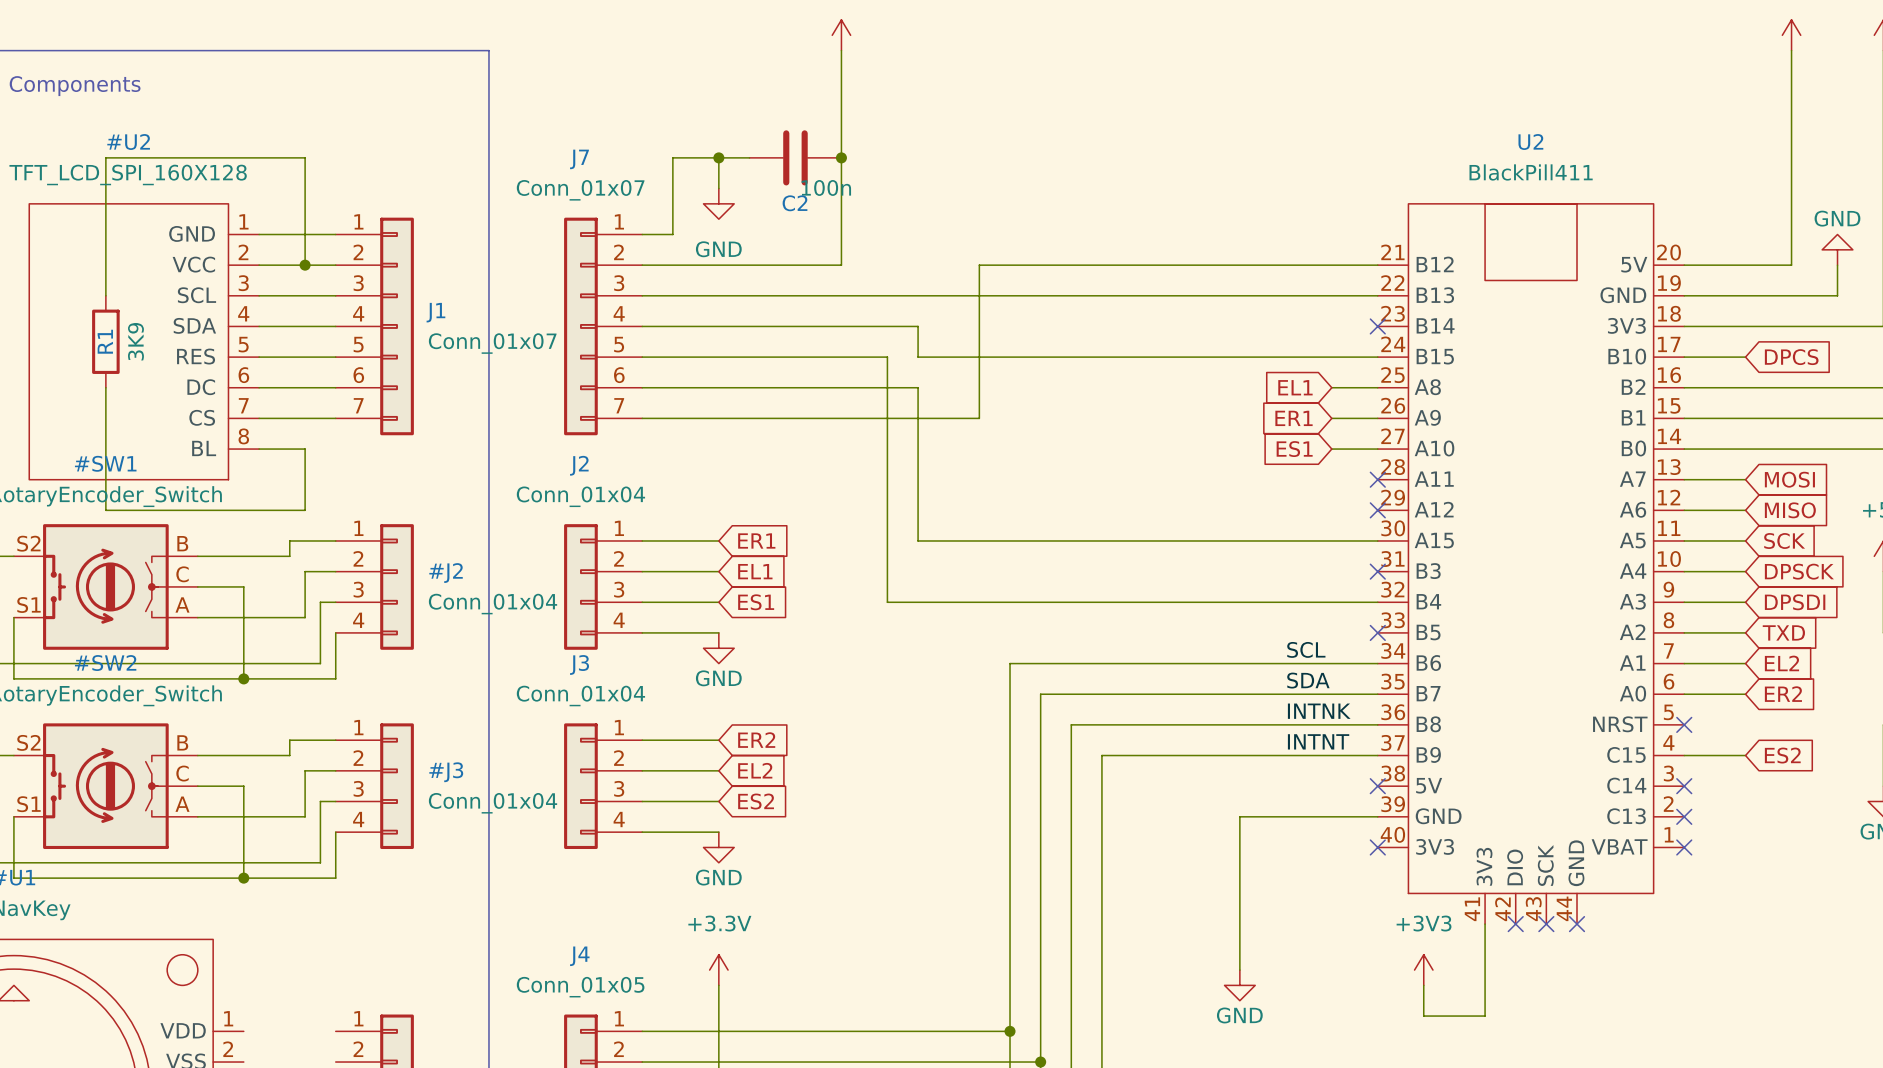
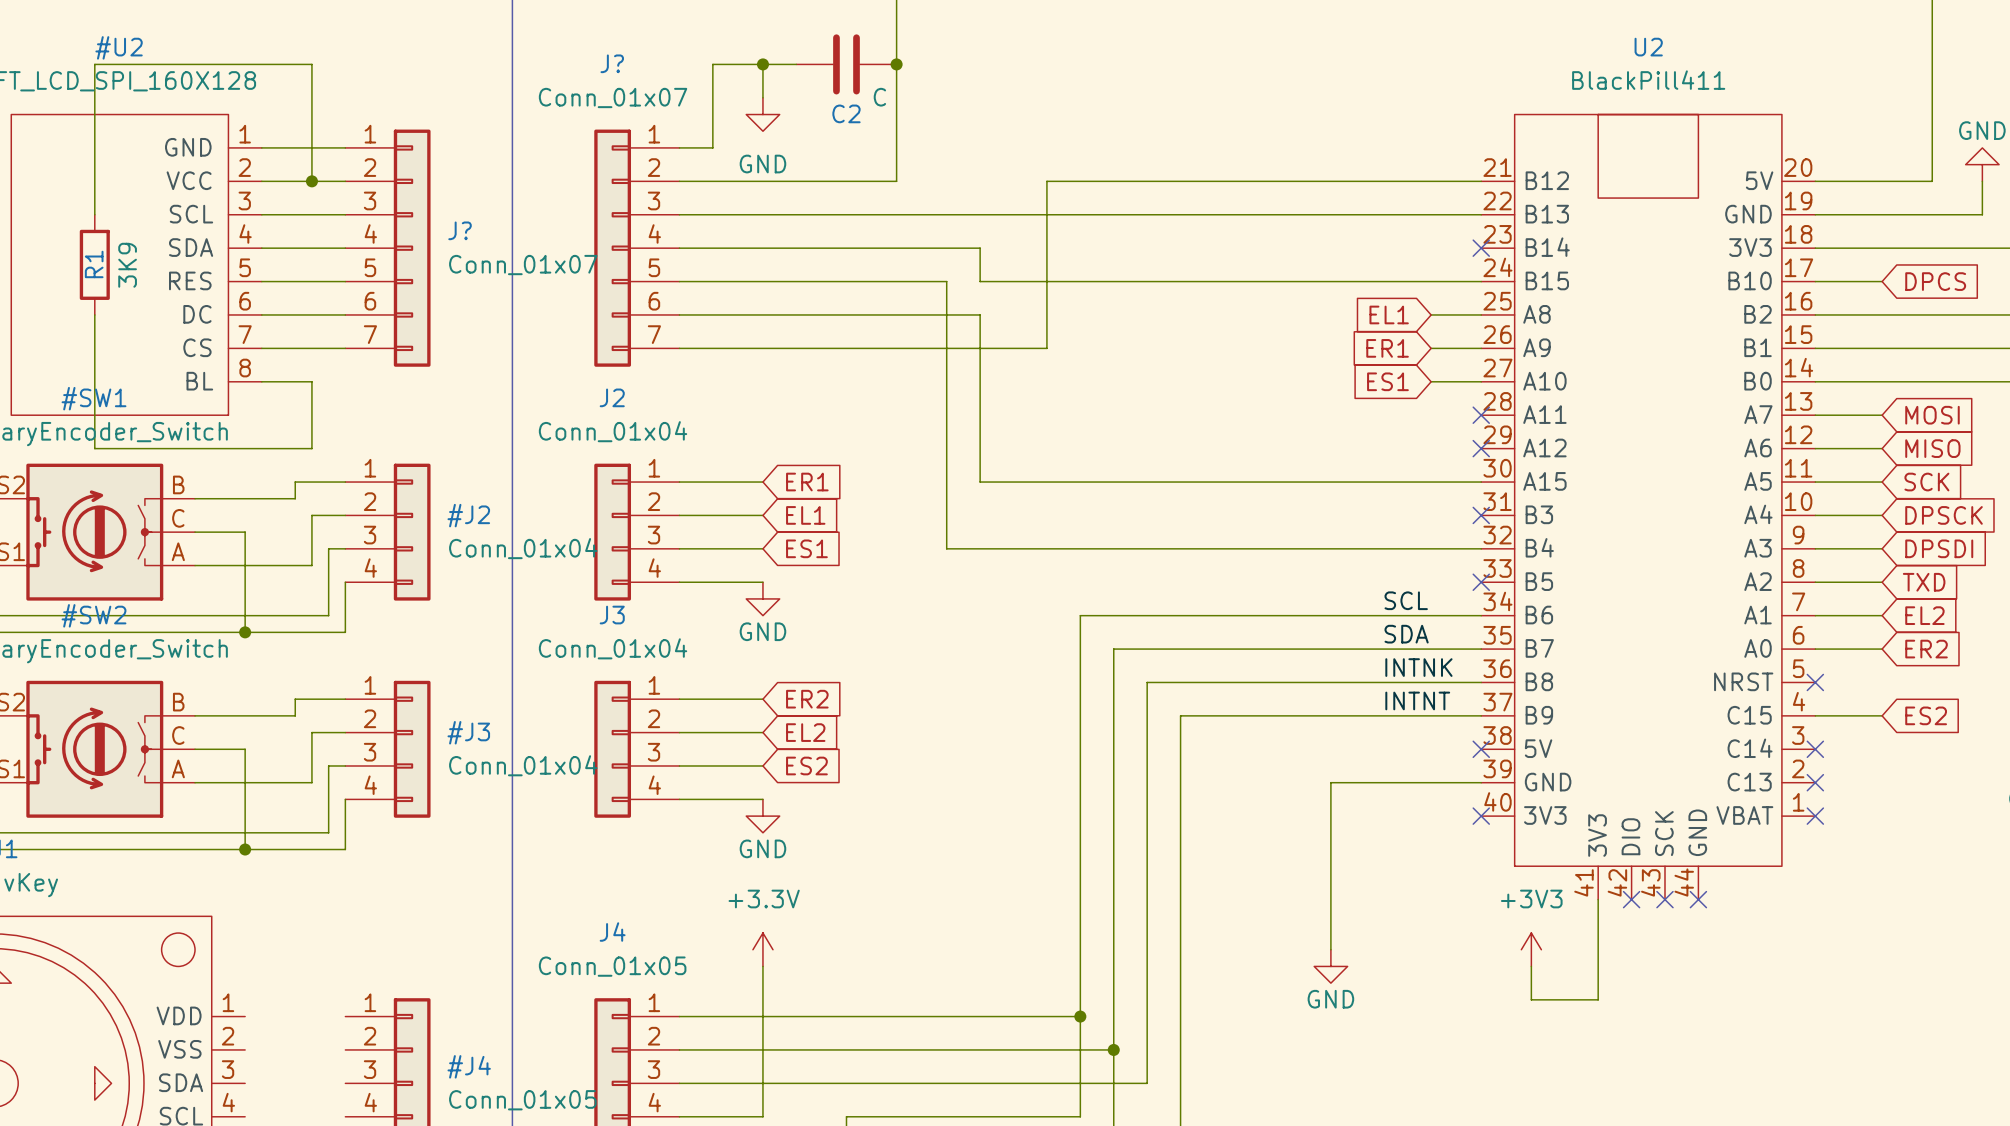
J7 name: J7 (579, 159) -> J? (612, 63)
C2 value: 100n (826, 187) -> C (879, 97)
J1 name: J1 (435, 312) -> J? (460, 230)

